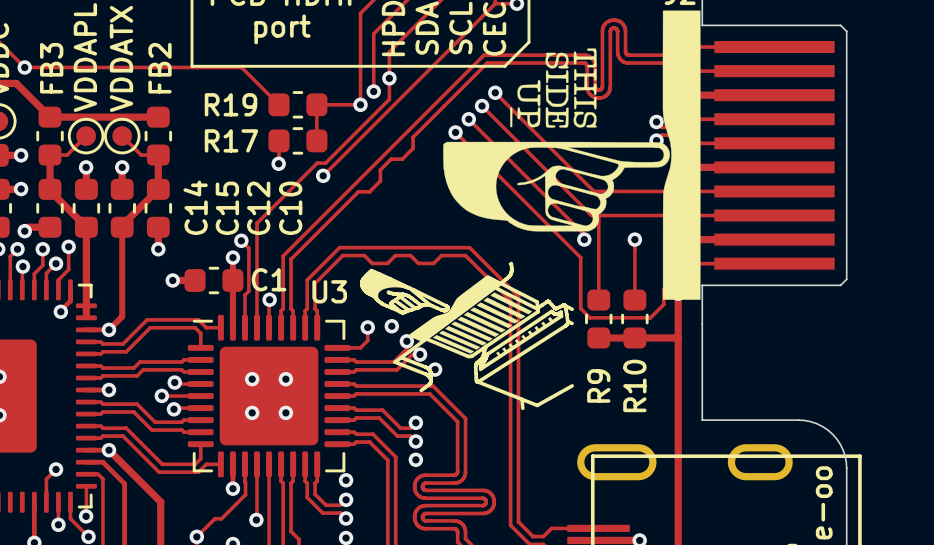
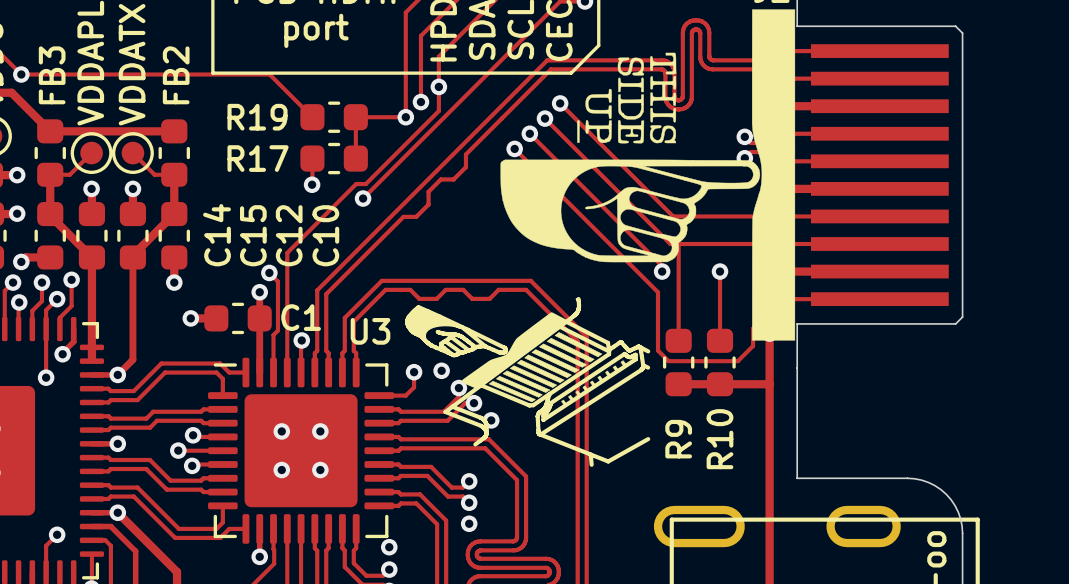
track: none -> (46, 329) (46, 377)
via: none -> (46, 377)

